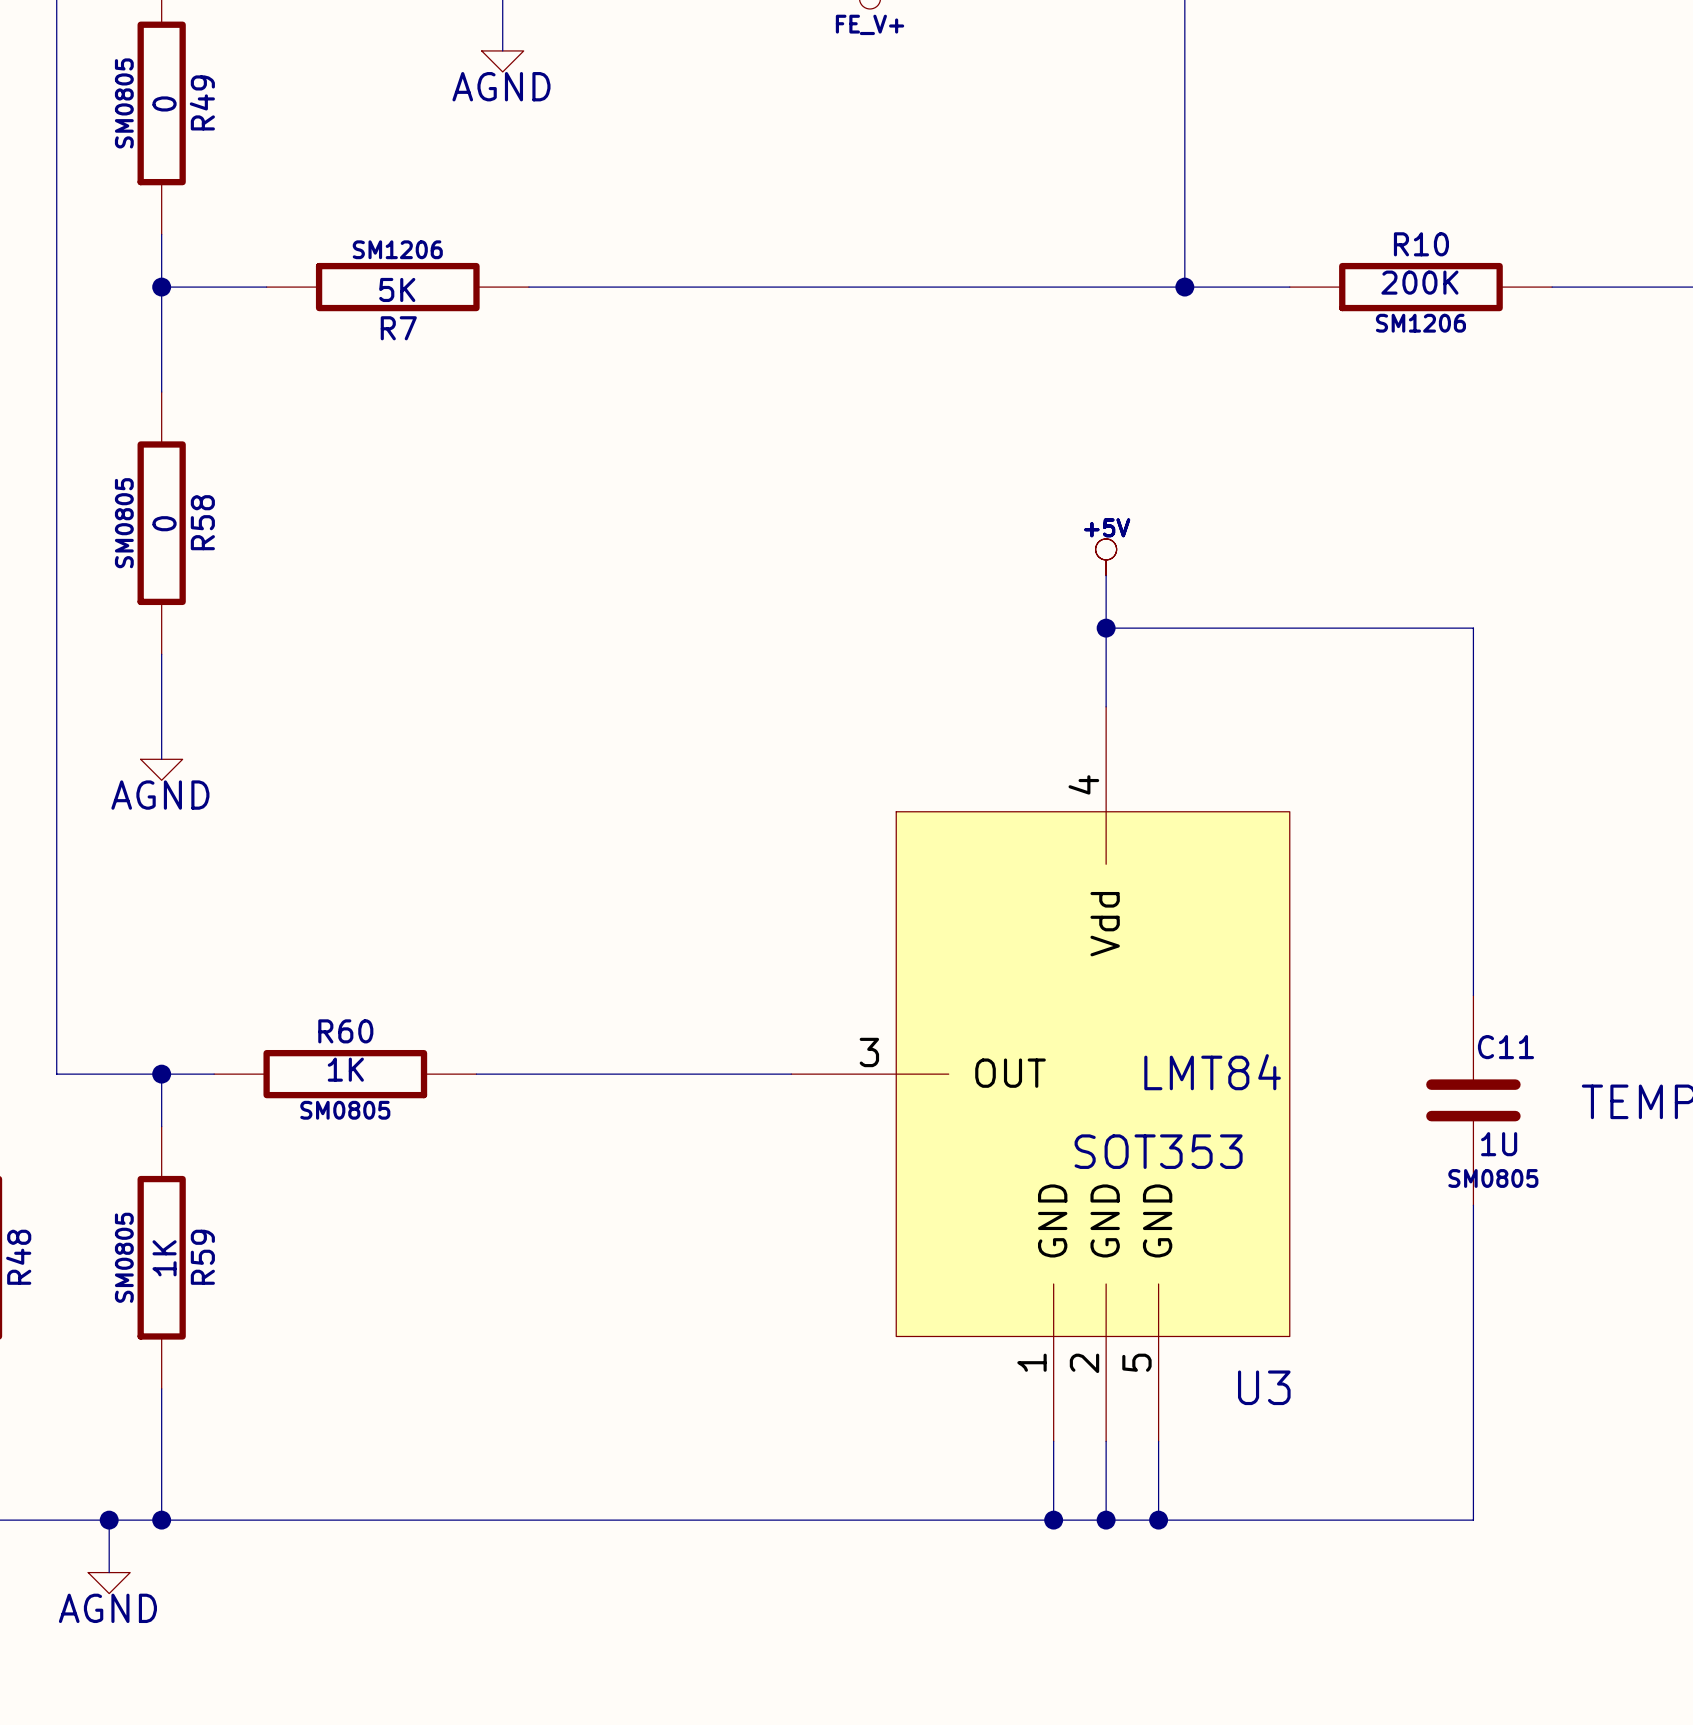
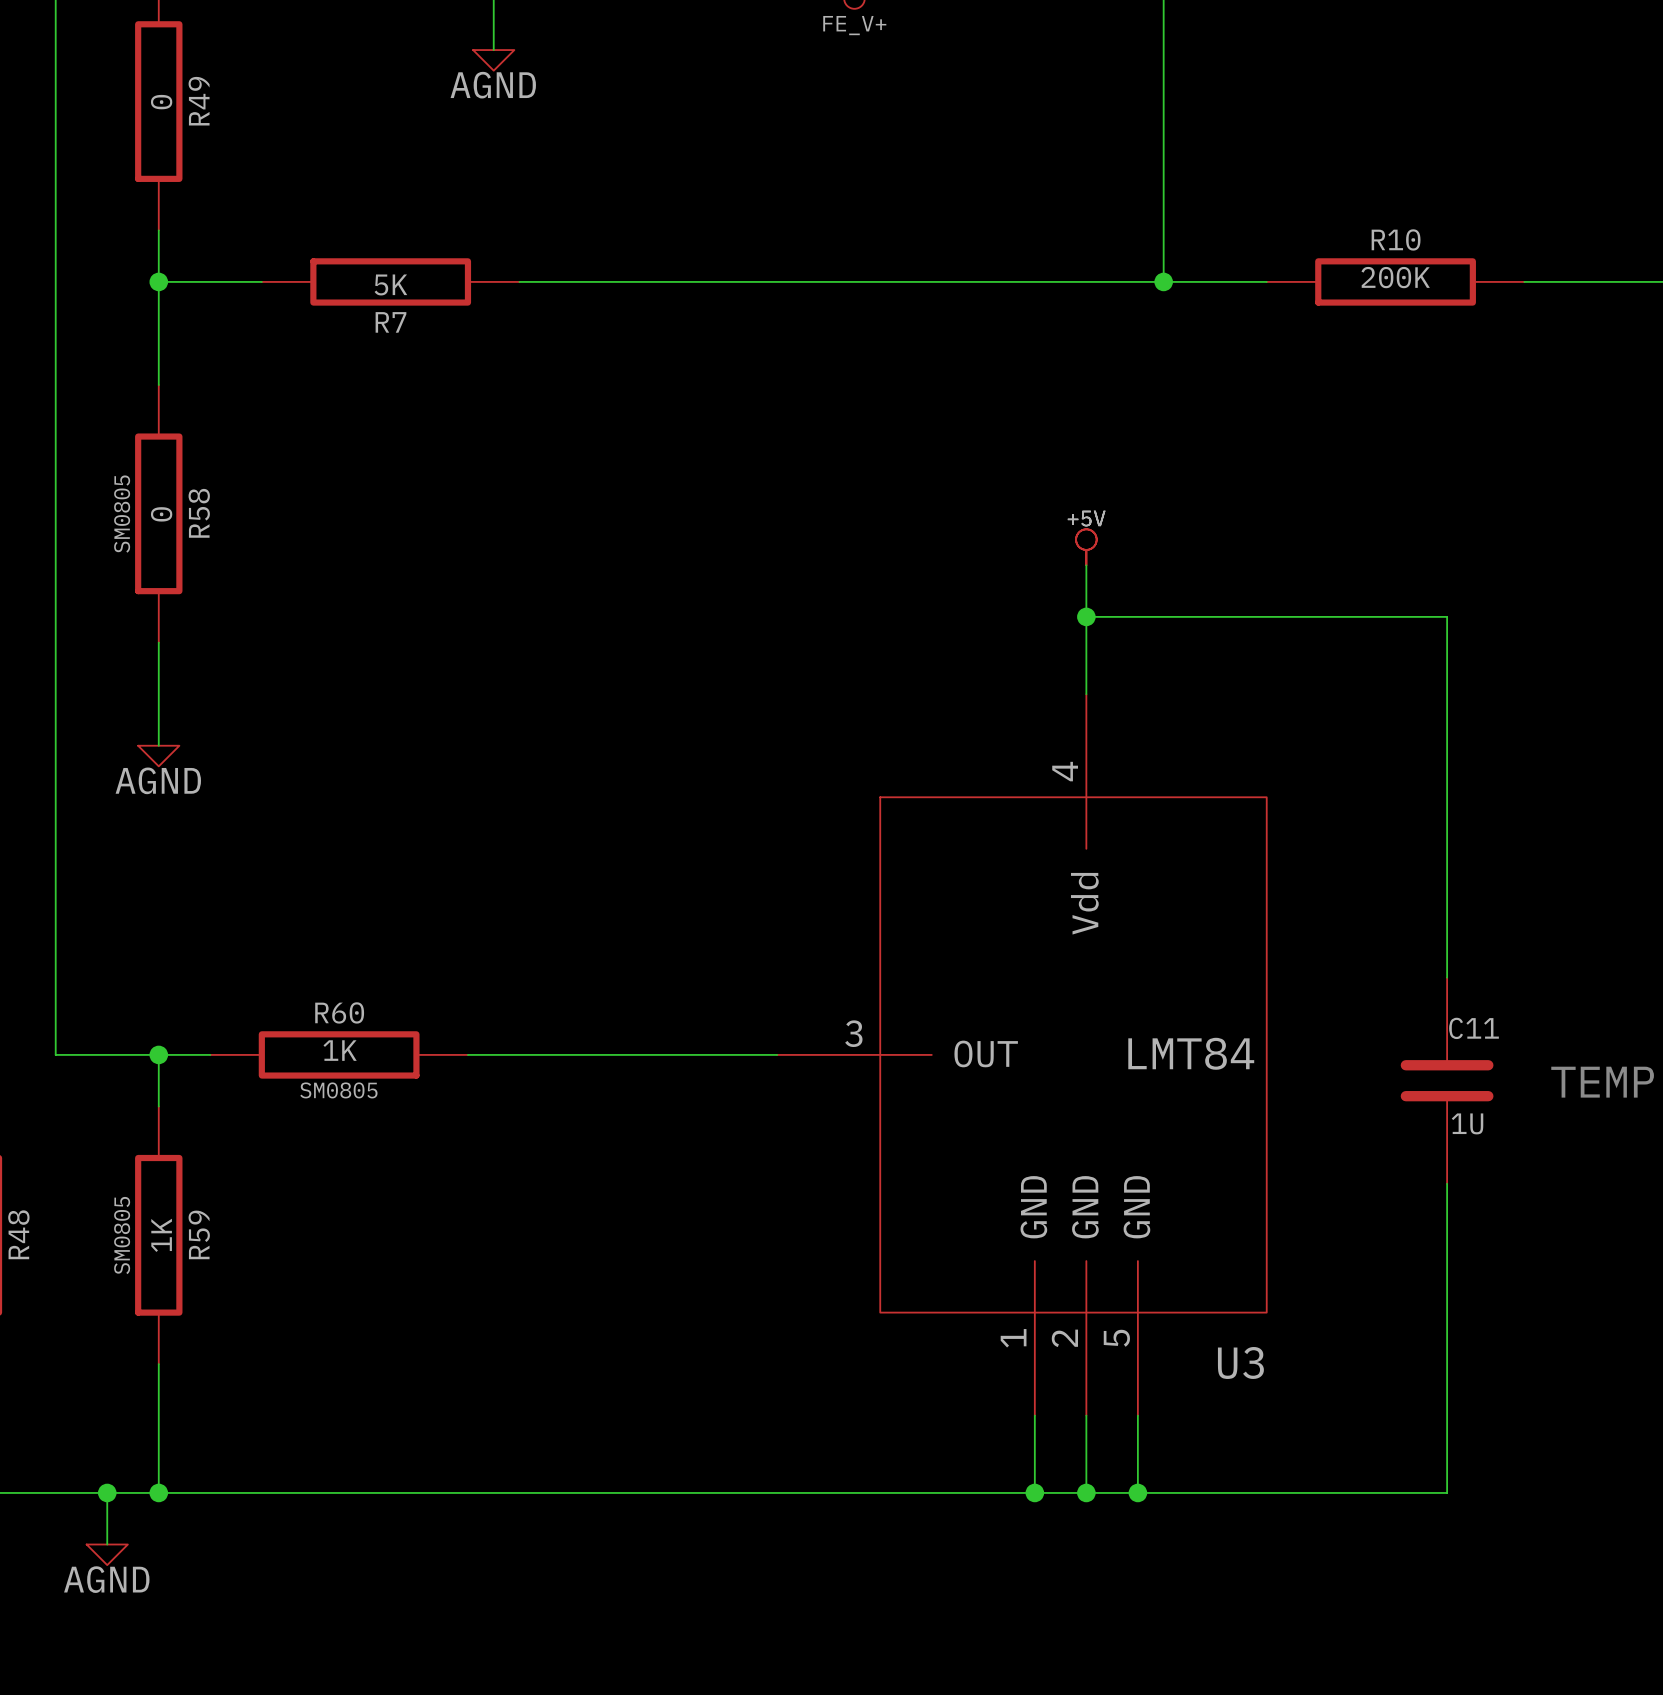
R49 text: SM0805 (124, 103) -> none
R7 text: SM1206 (397, 249) -> none
R10 text: SM1206 (1420, 323) -> none
U3 text: SOT353 (1158, 1151) -> none
C11 text: SM0805 (1493, 1178) -> none

